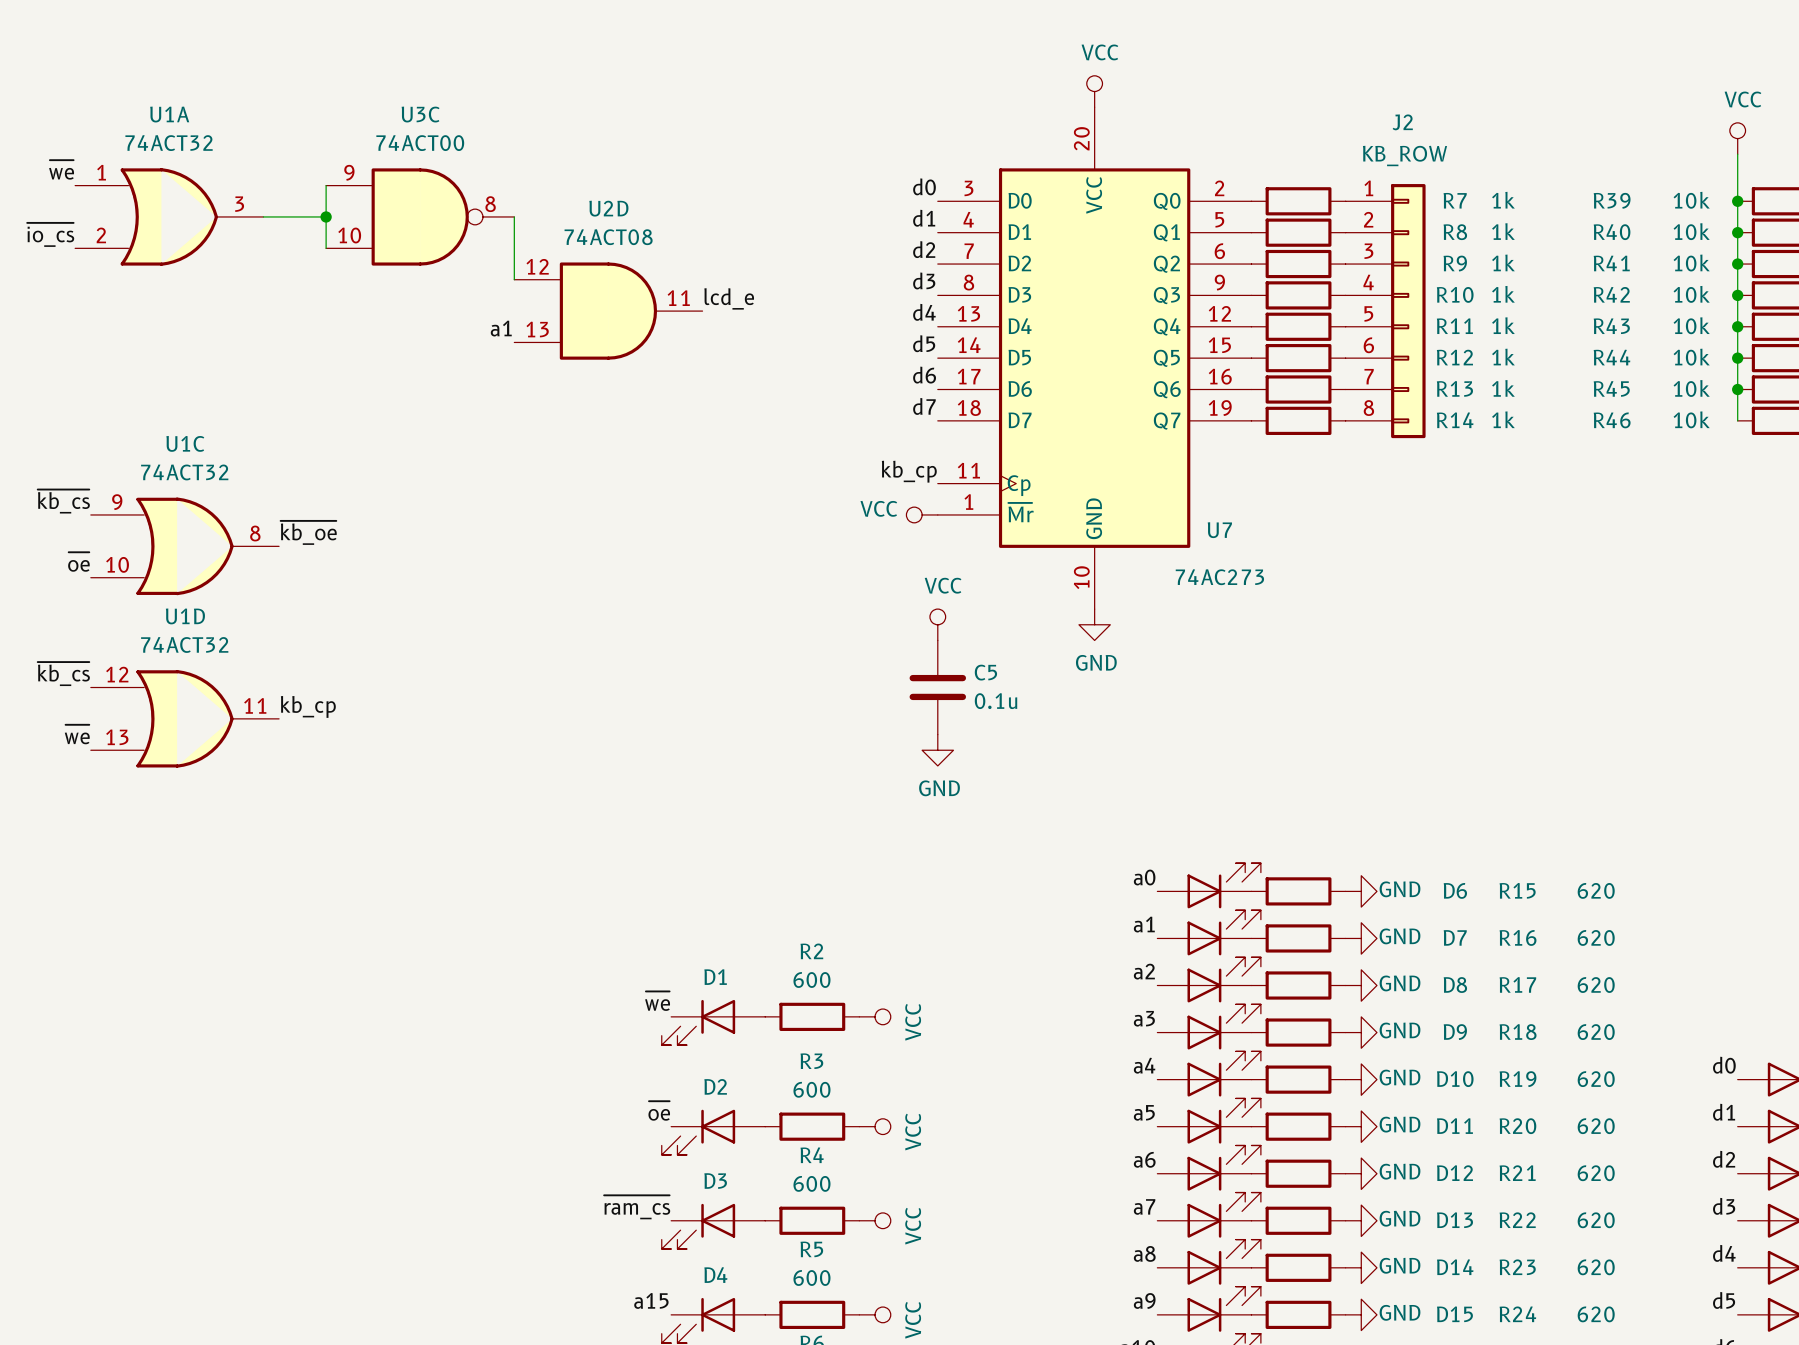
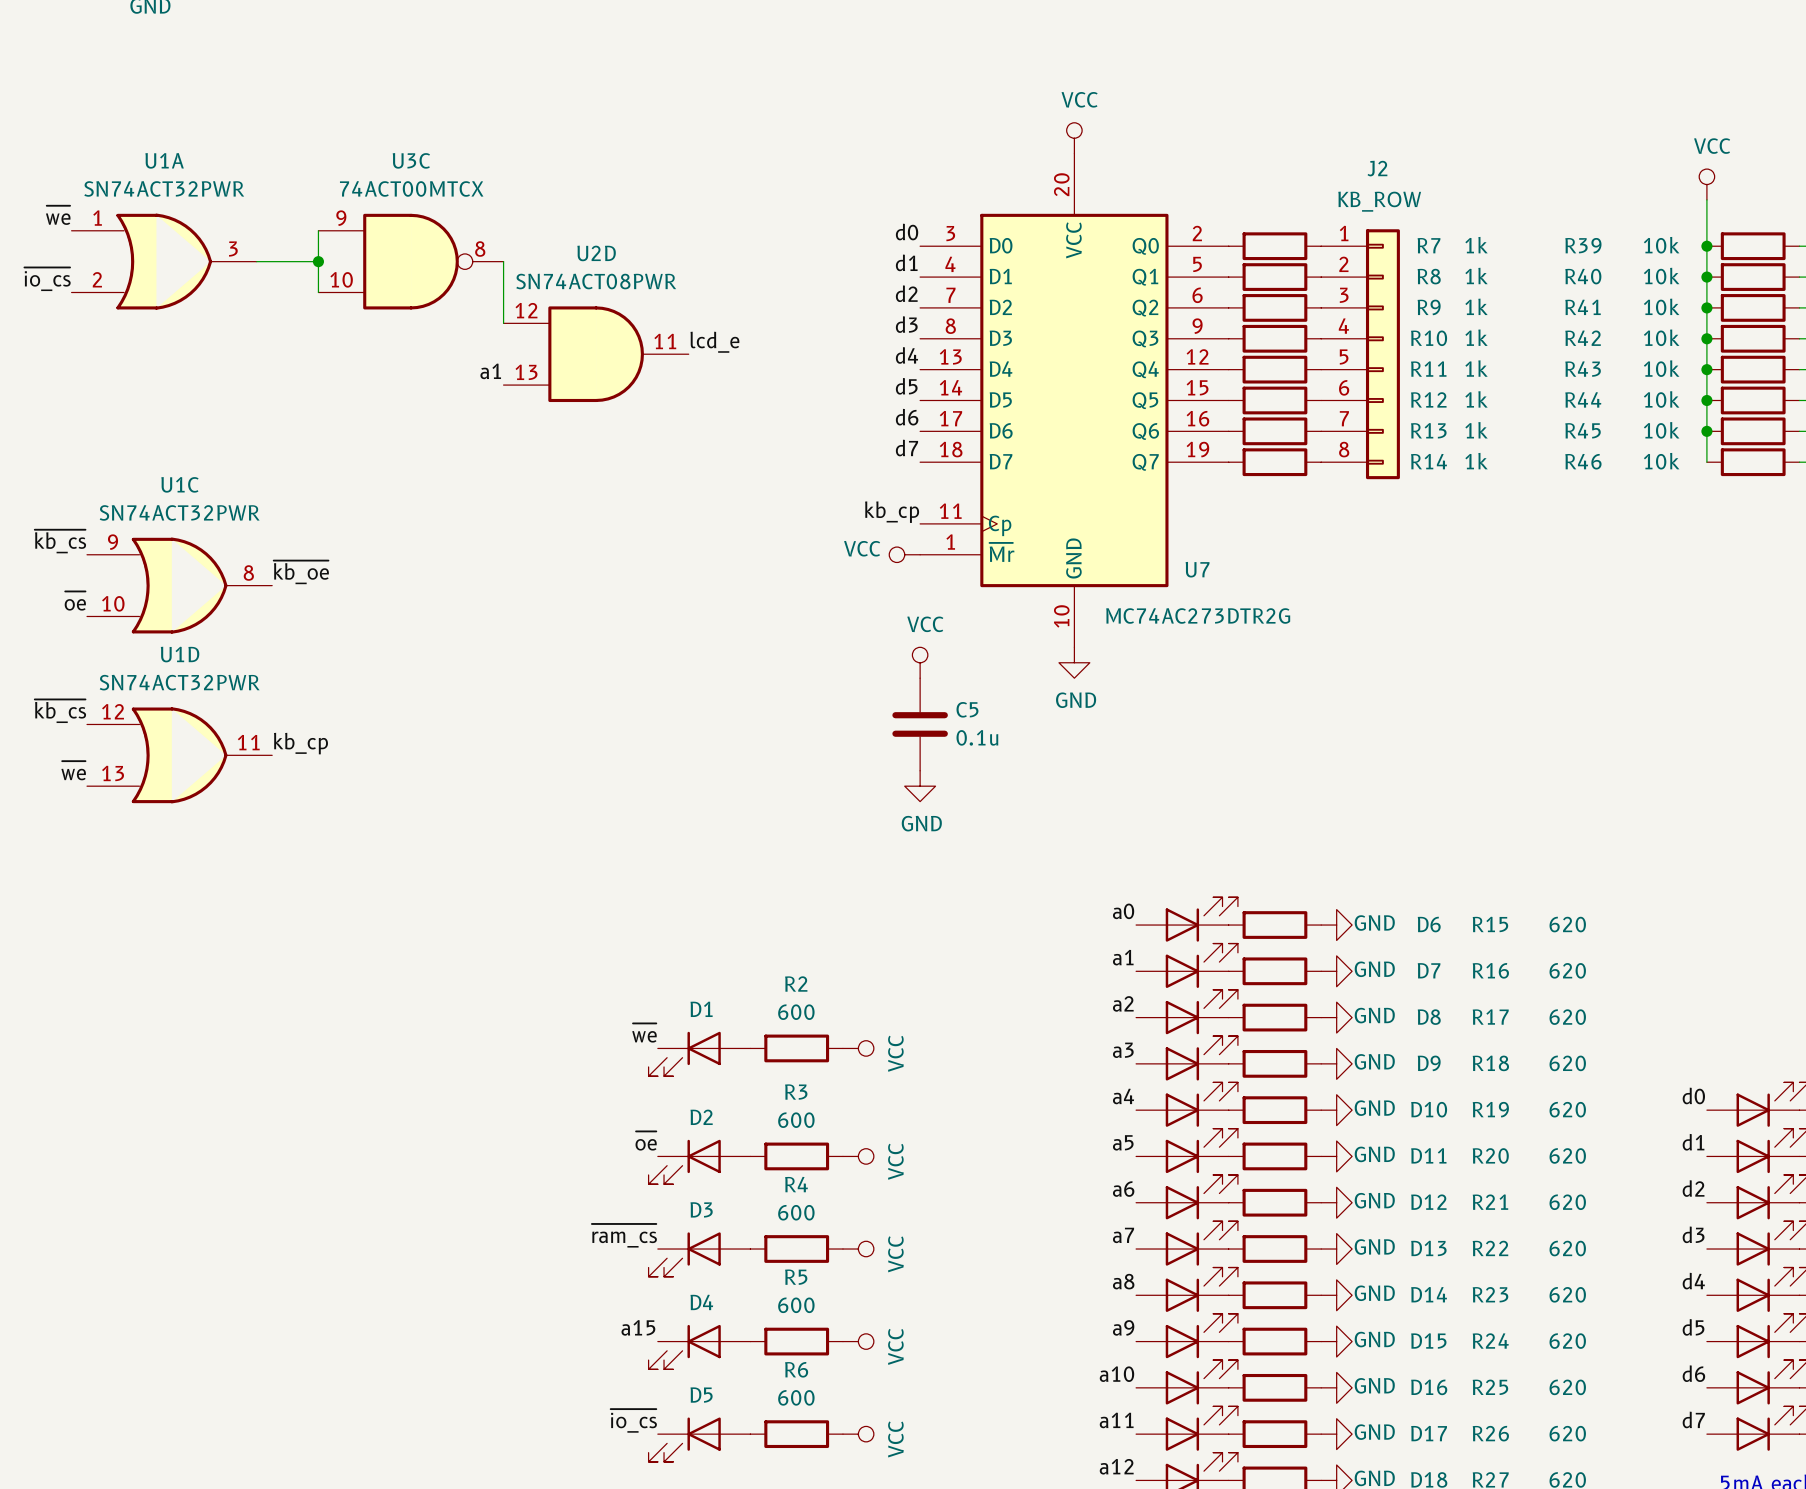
U1A value: 74ACT32 (169, 143) -> SN74ACT32PWR (164, 188)
U3C value: 74ACT00 (420, 143) -> 74ACT00MTCX (411, 188)
U2D value: 74ACT08 (608, 237) -> SN74ACT08PWR (596, 281)
U1C value: 74ACT32 (184, 472) -> SN74ACT32PWR (179, 512)
U7 value: 74AC273 (1219, 577) -> MC74AC273DTR2G (1198, 615)
U1D value: 74ACT32 (184, 644) -> SN74ACT32PWR (179, 682)

